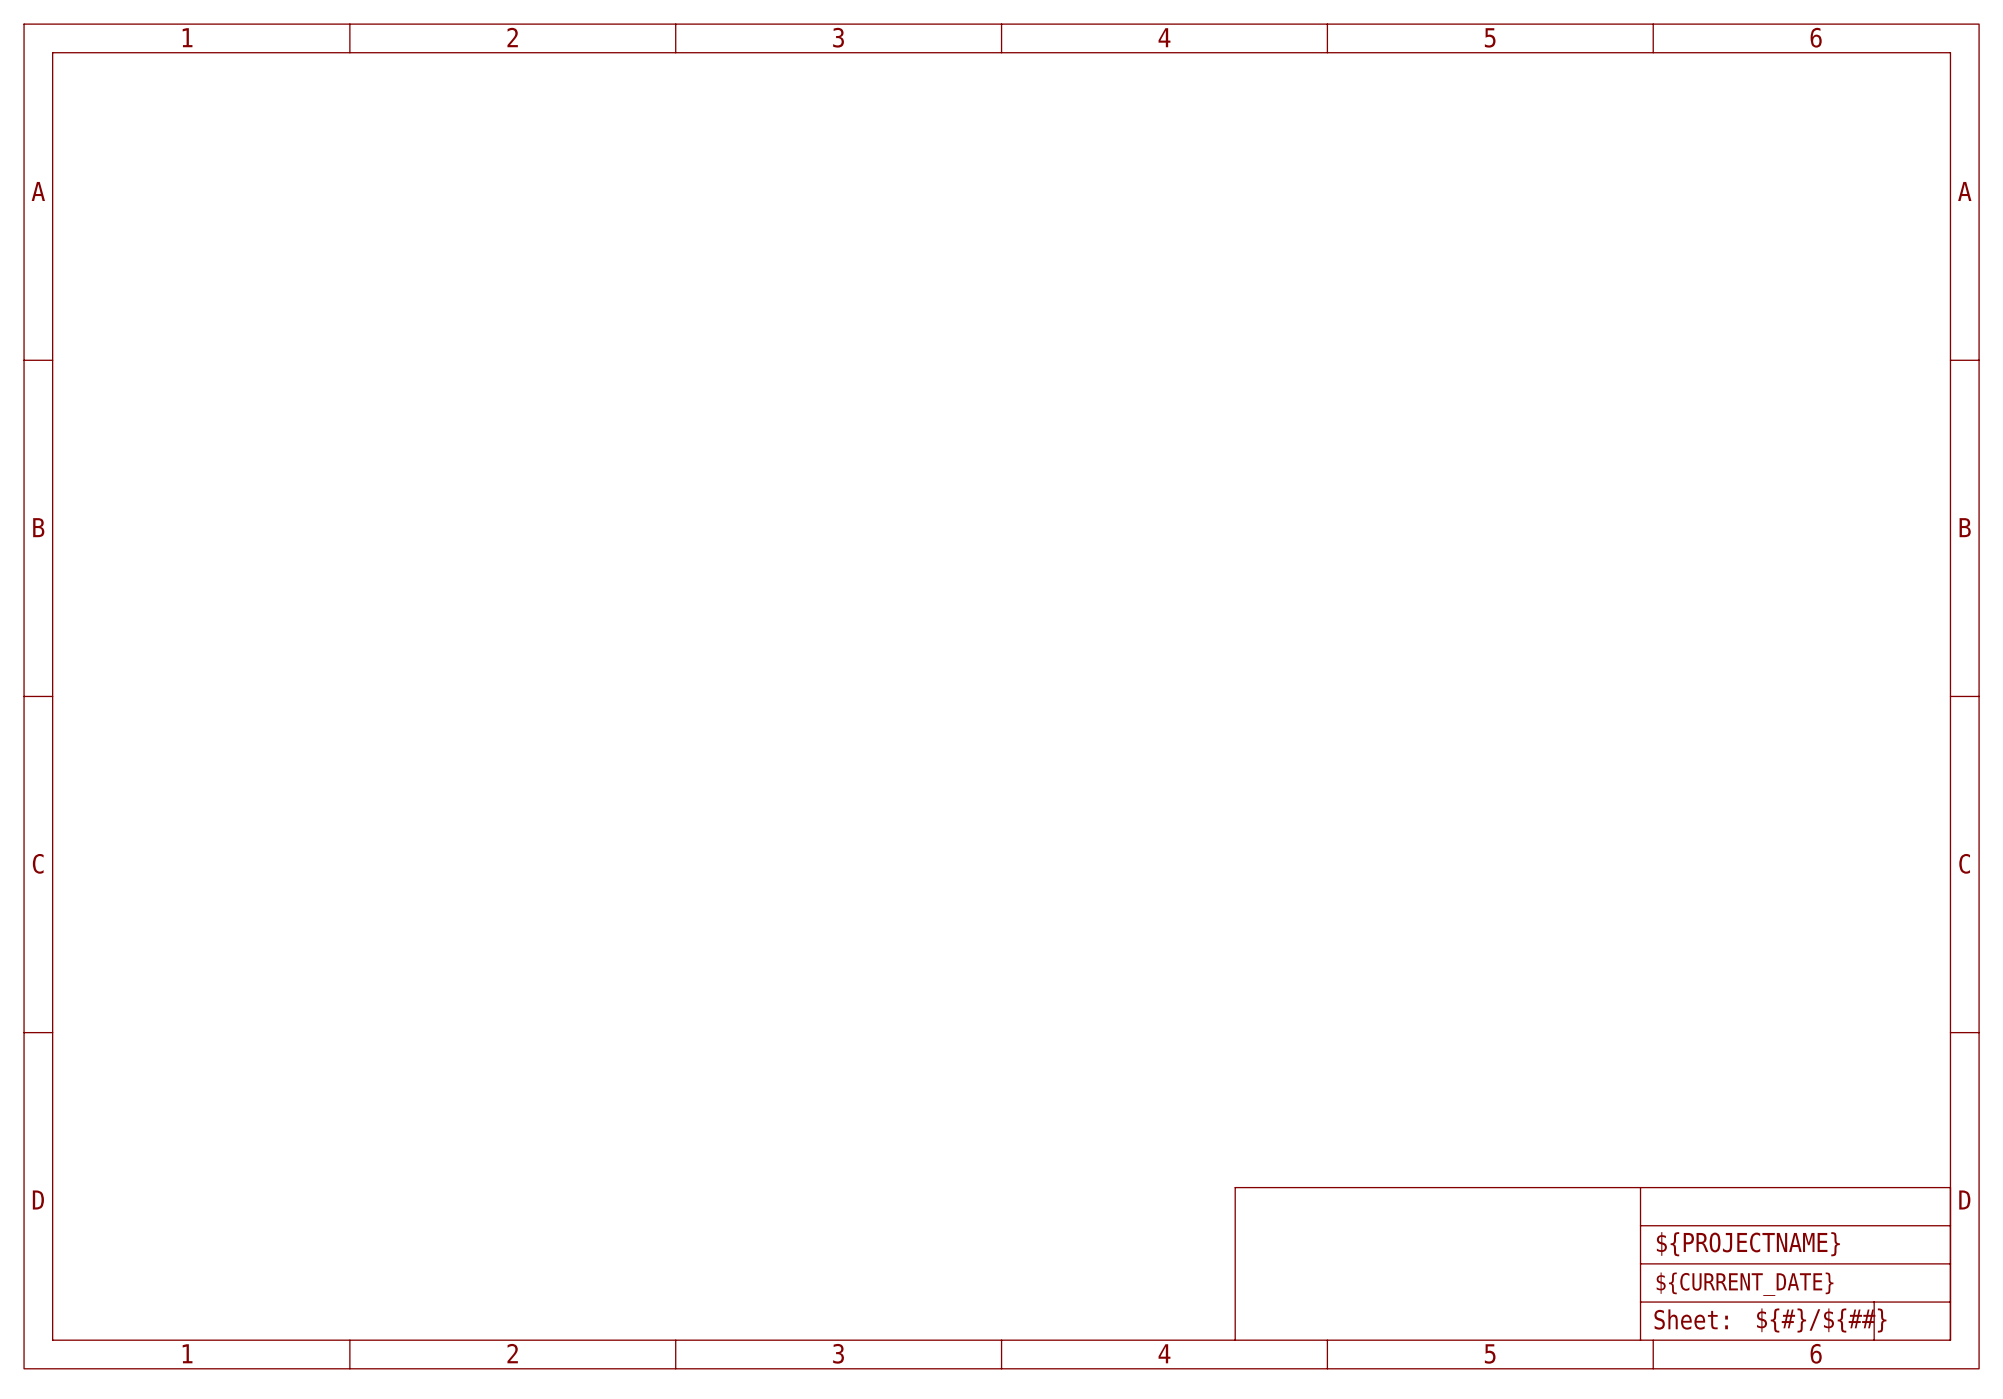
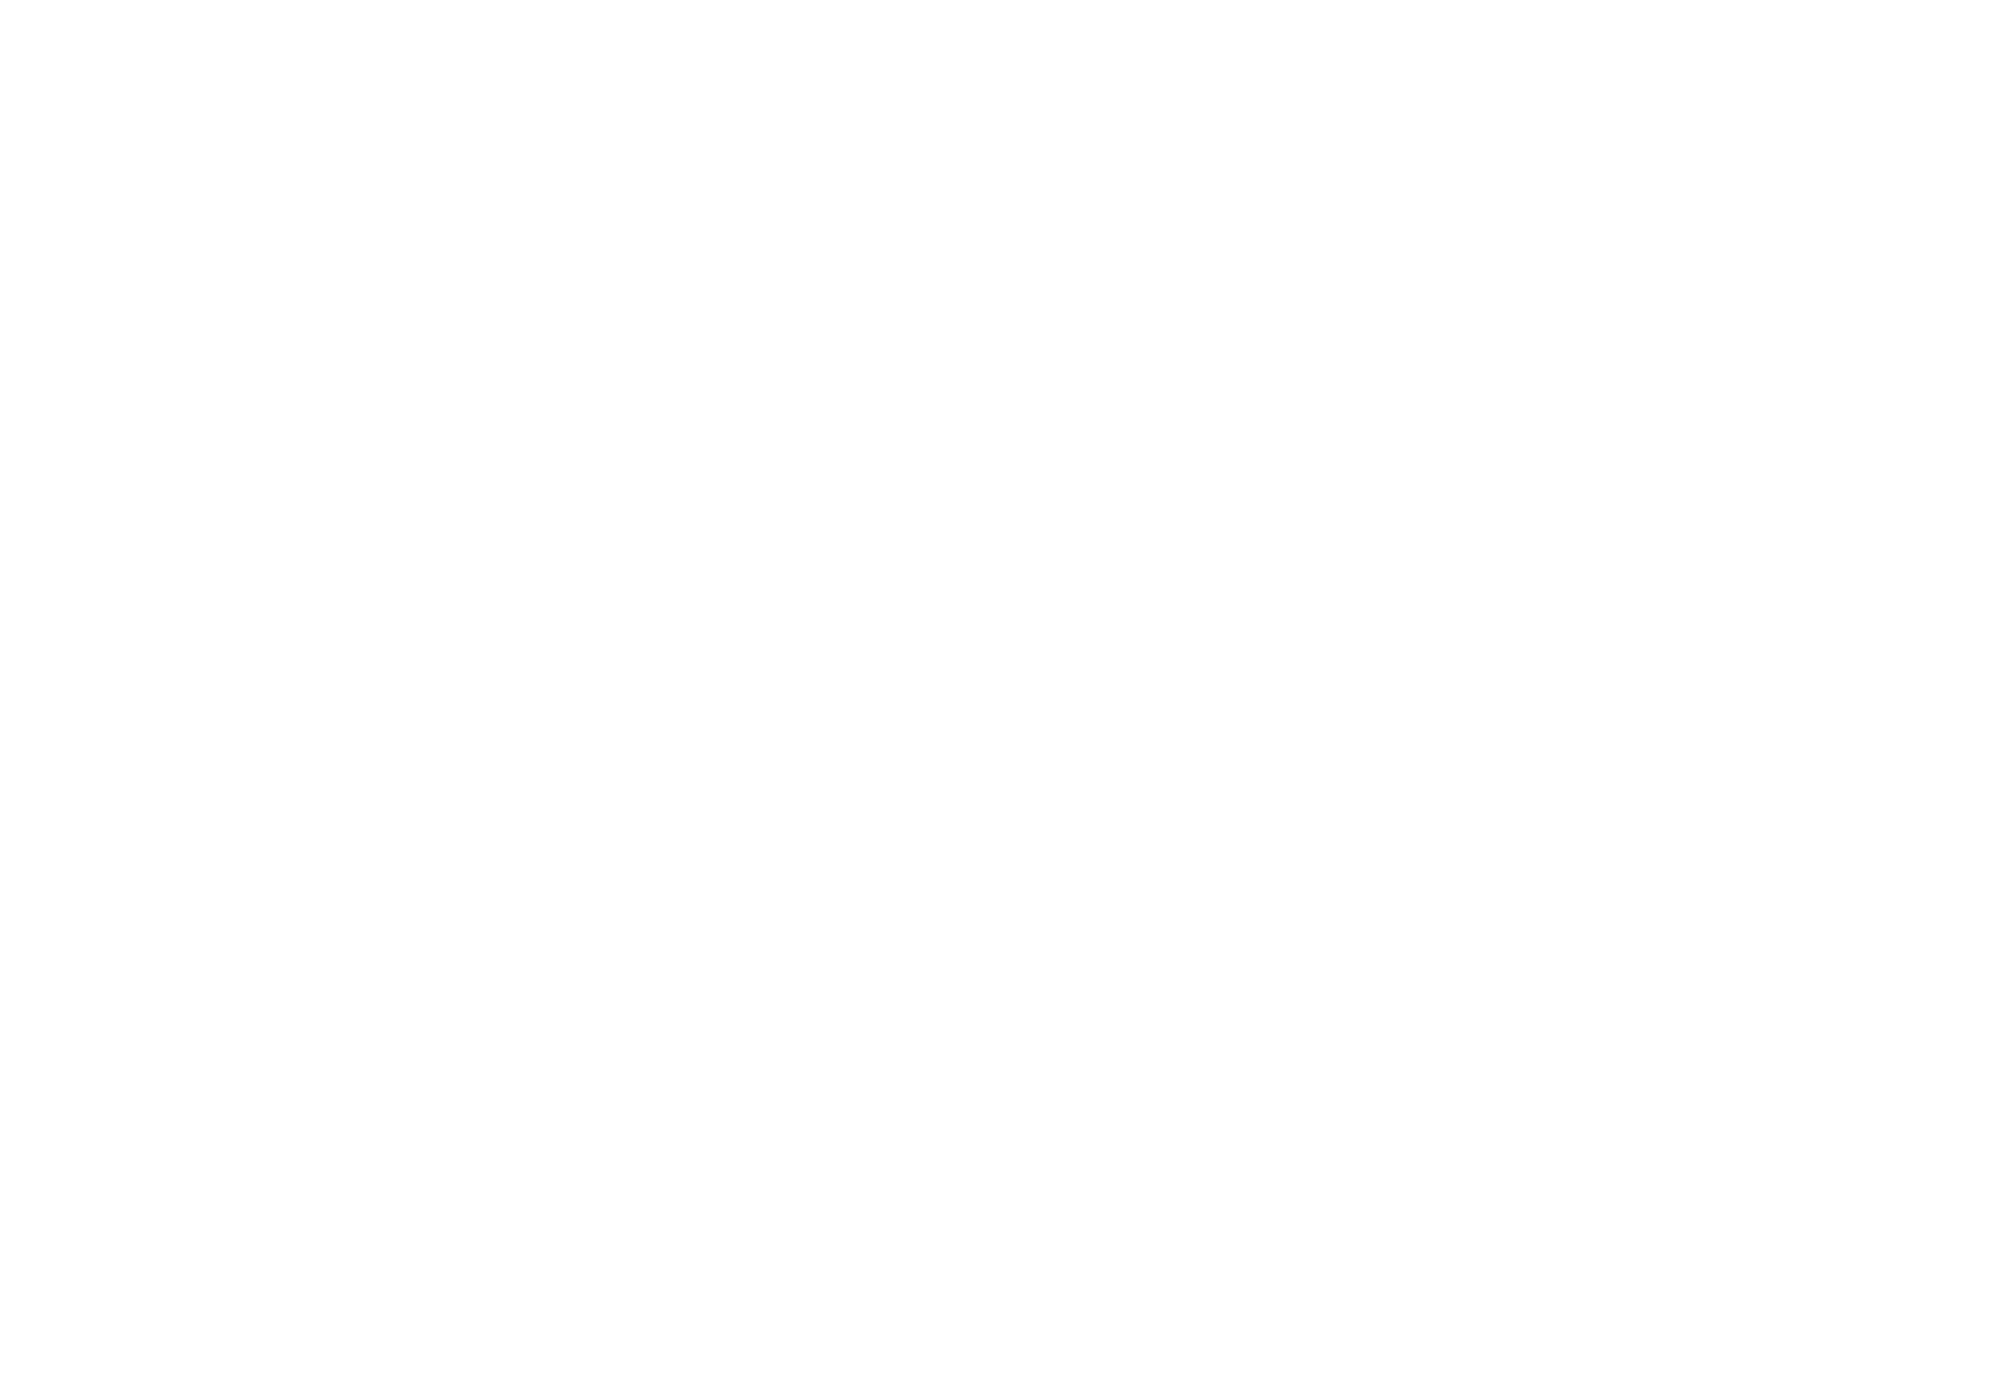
power symbol: (1001, 696) -> none

